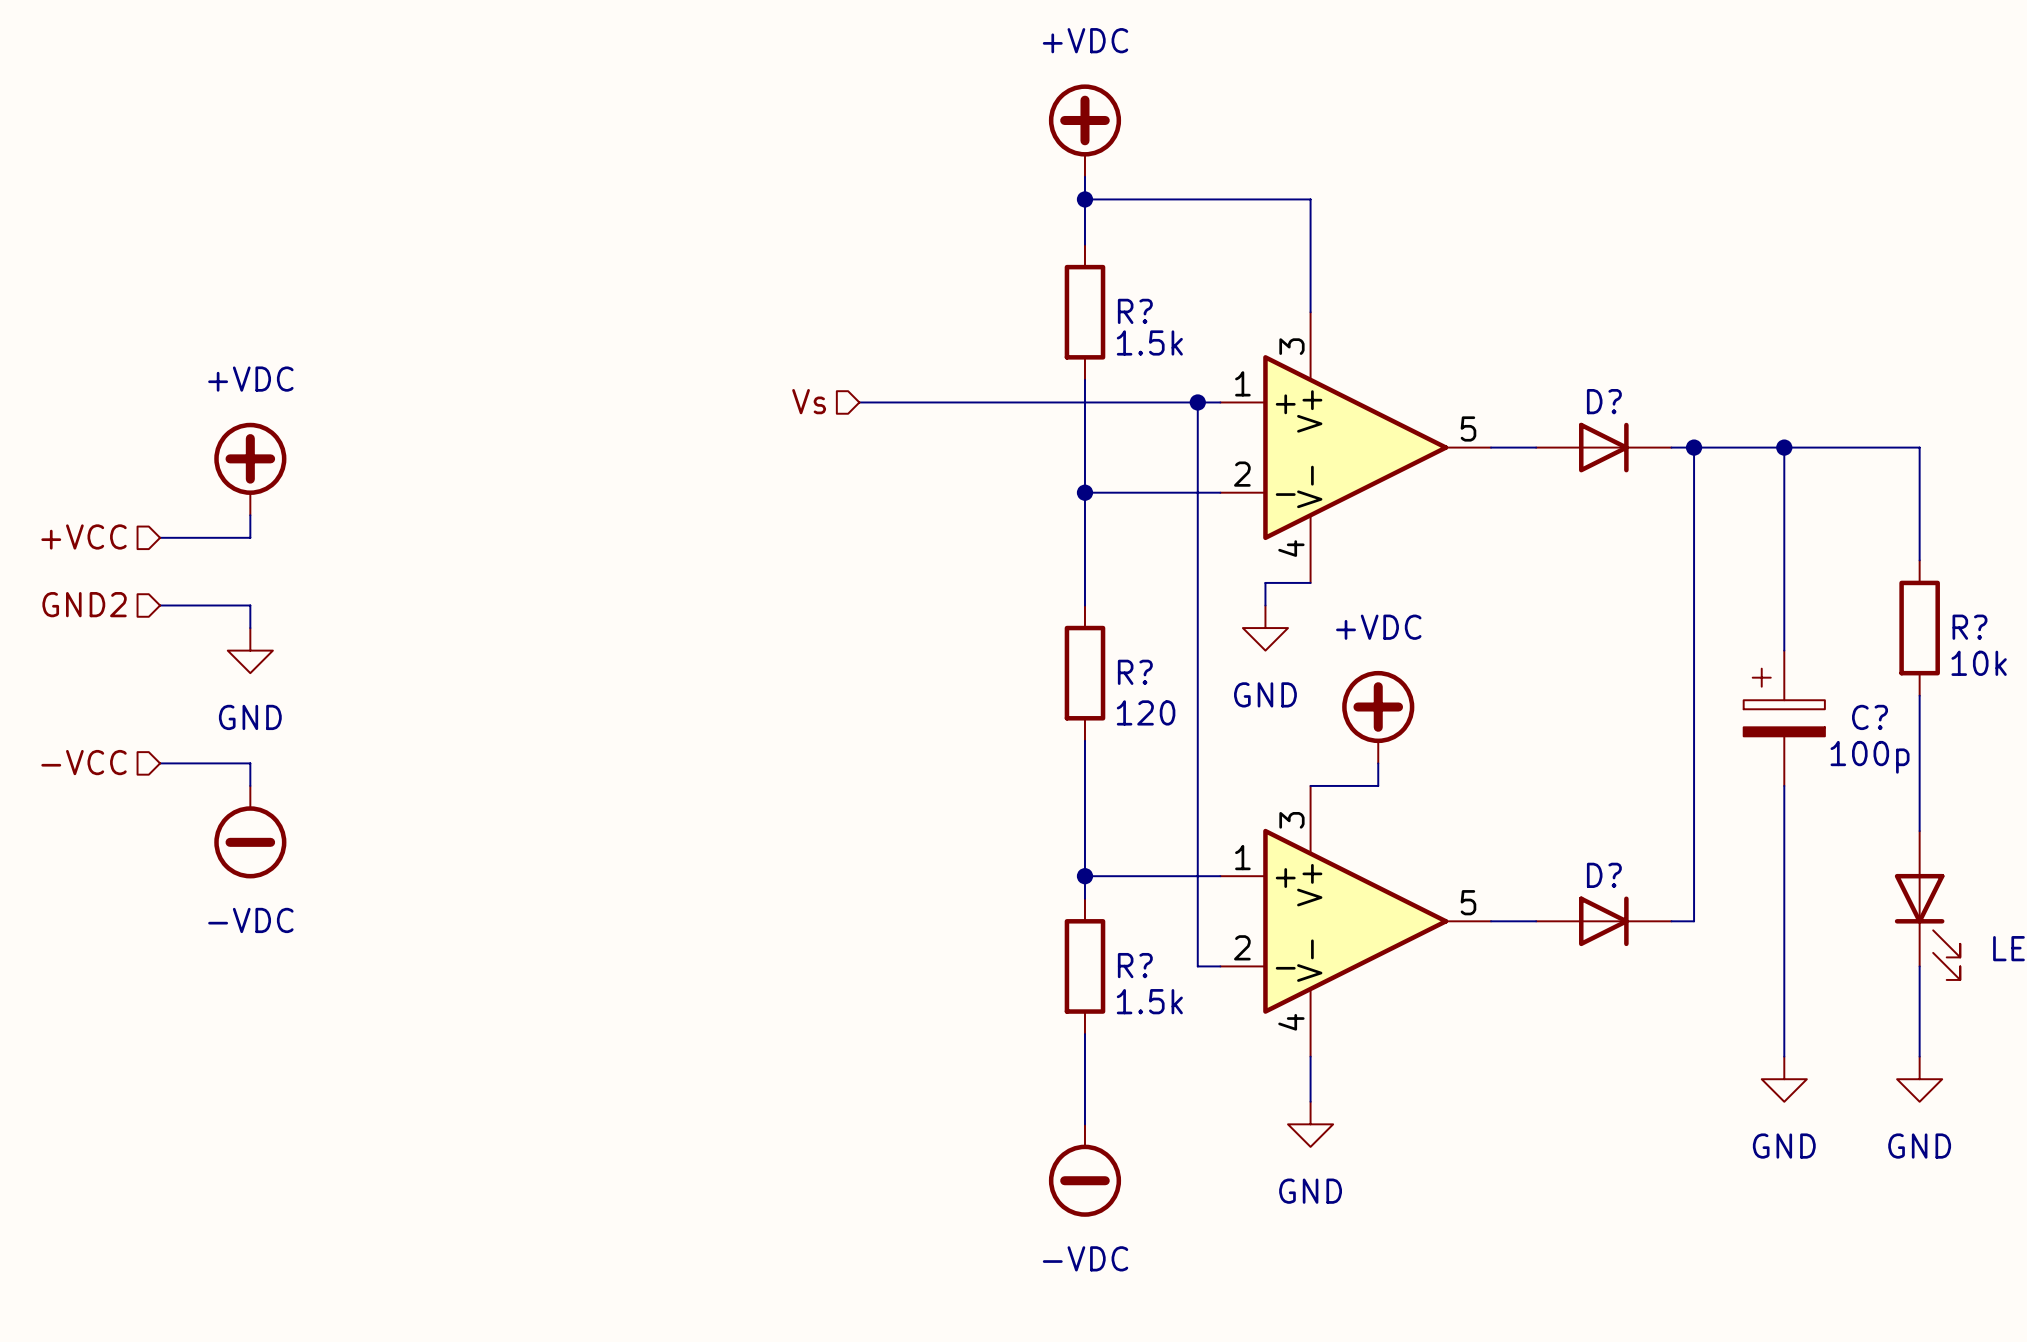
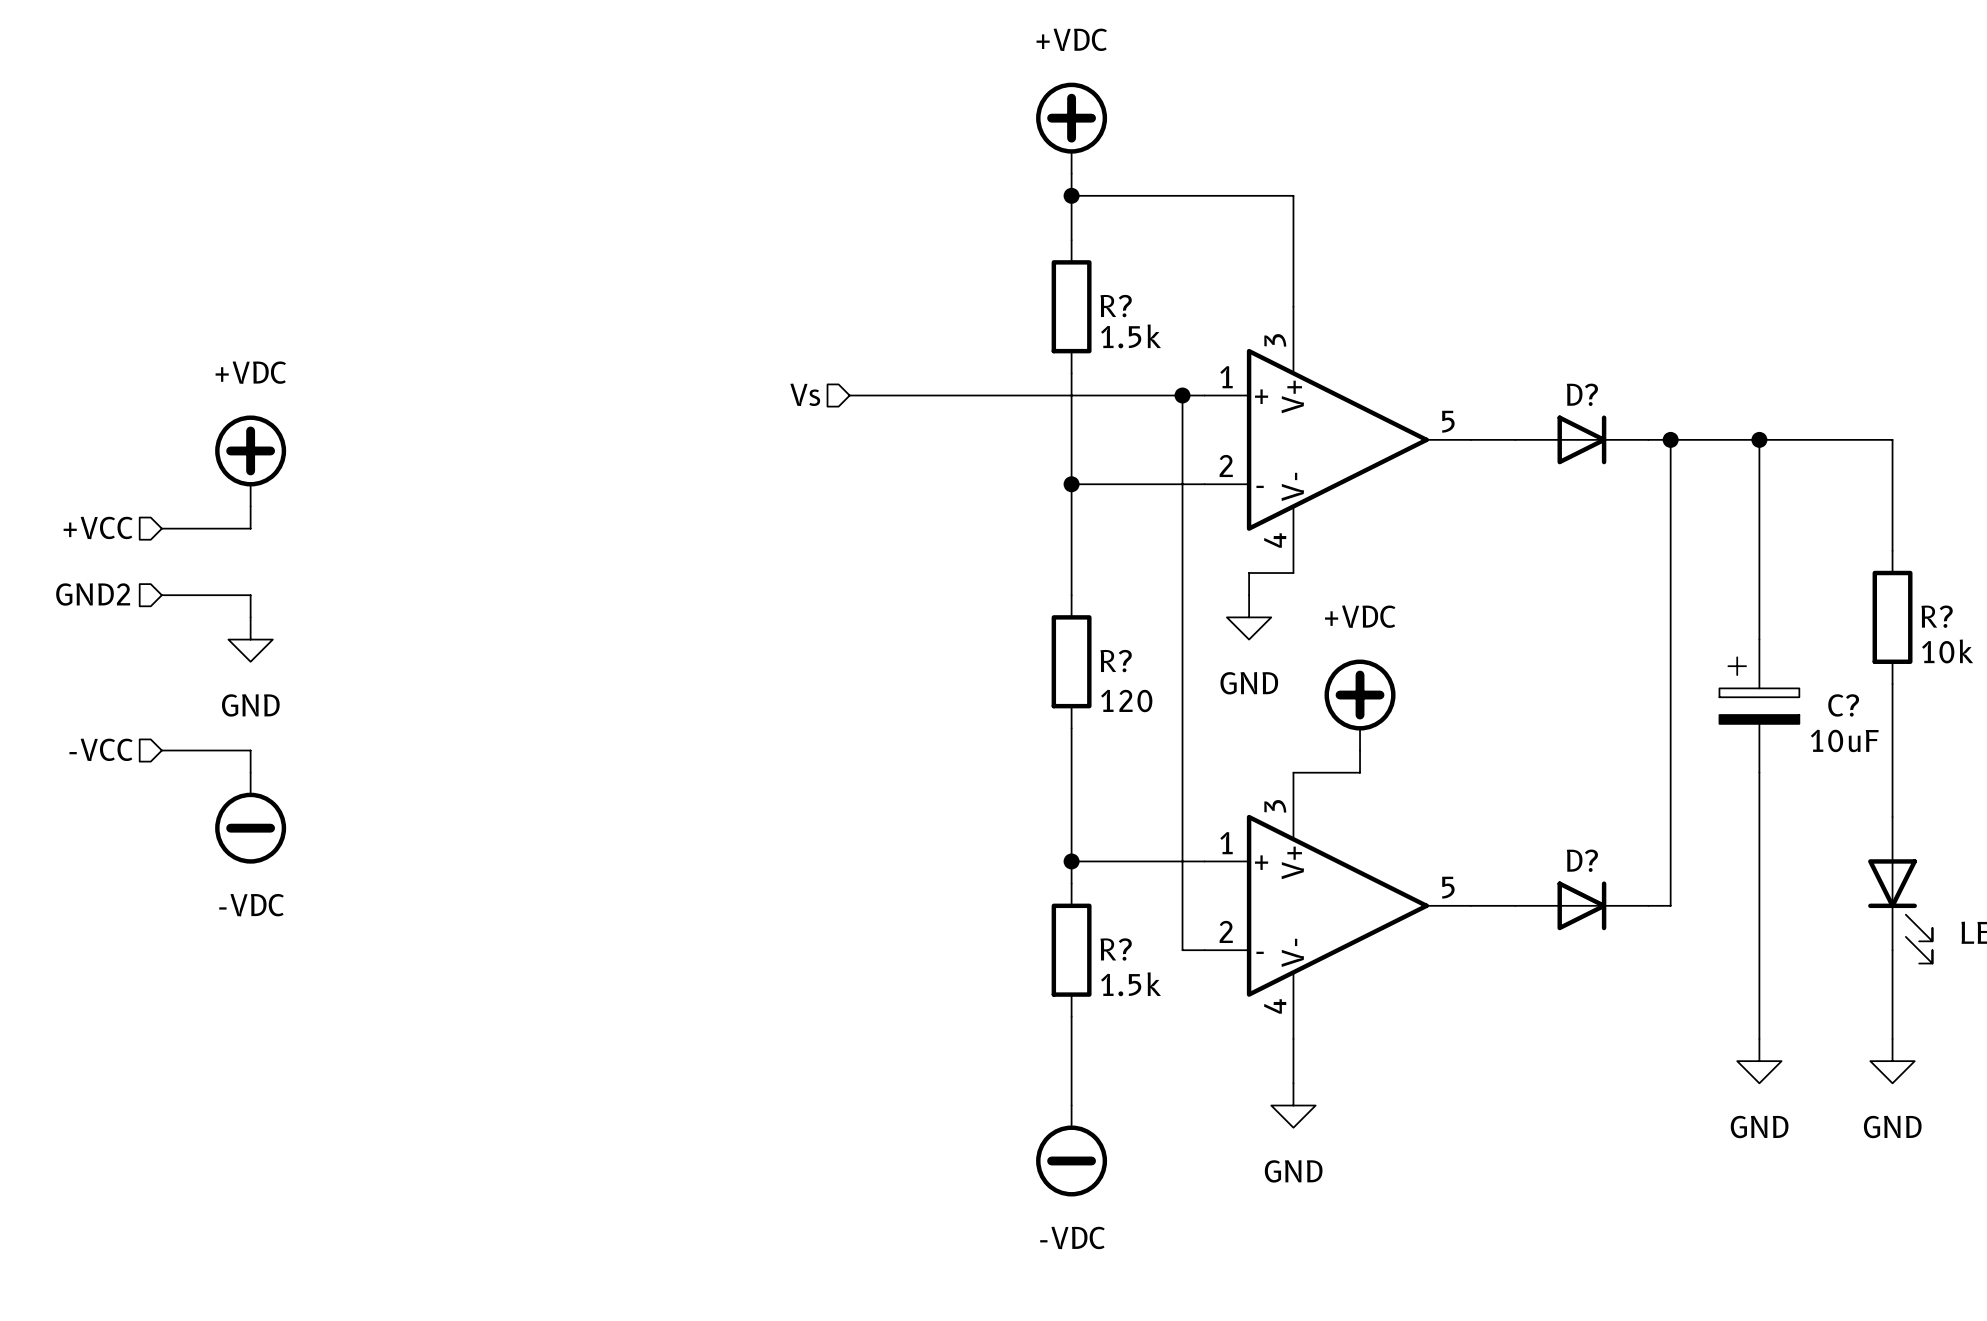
C? value: 100p (1870, 757) -> 10uF (1844, 740)

